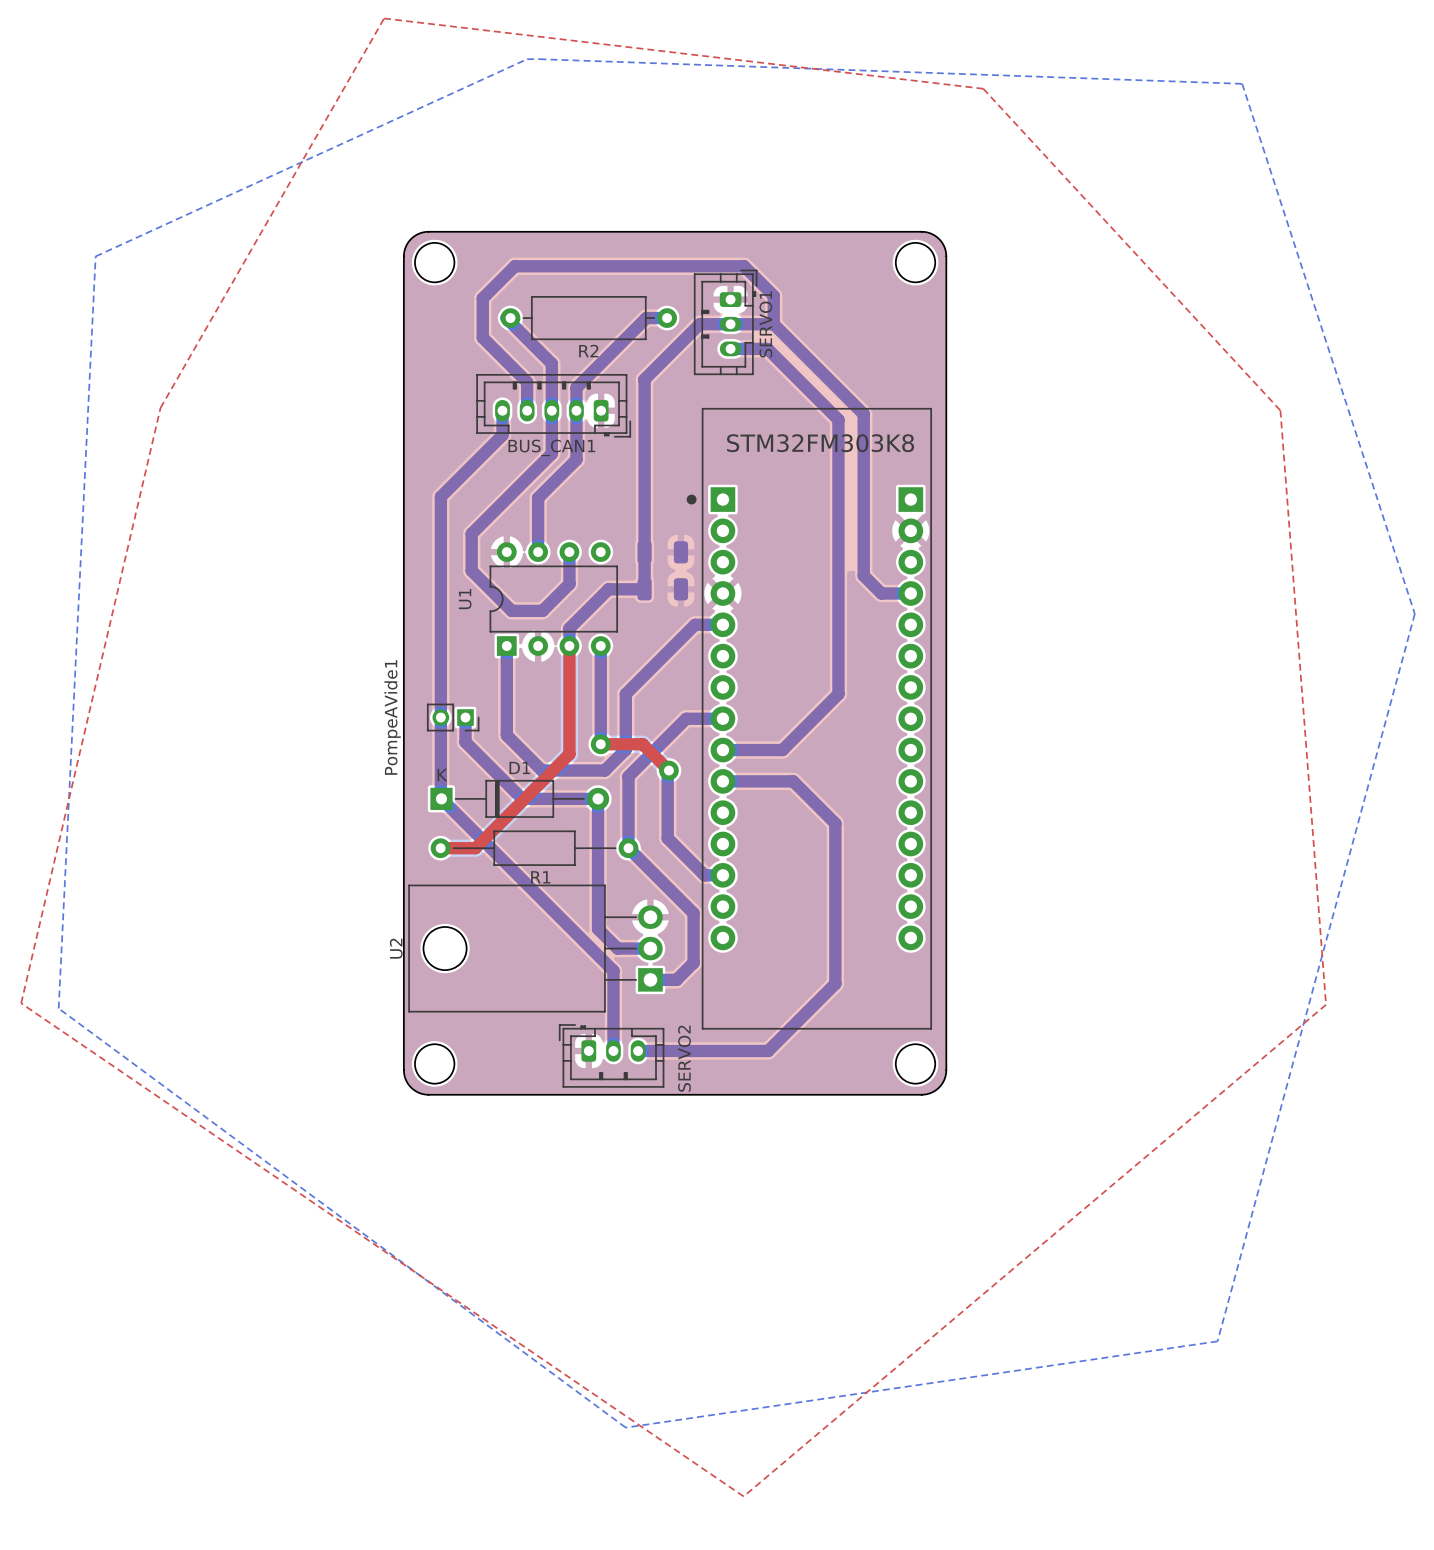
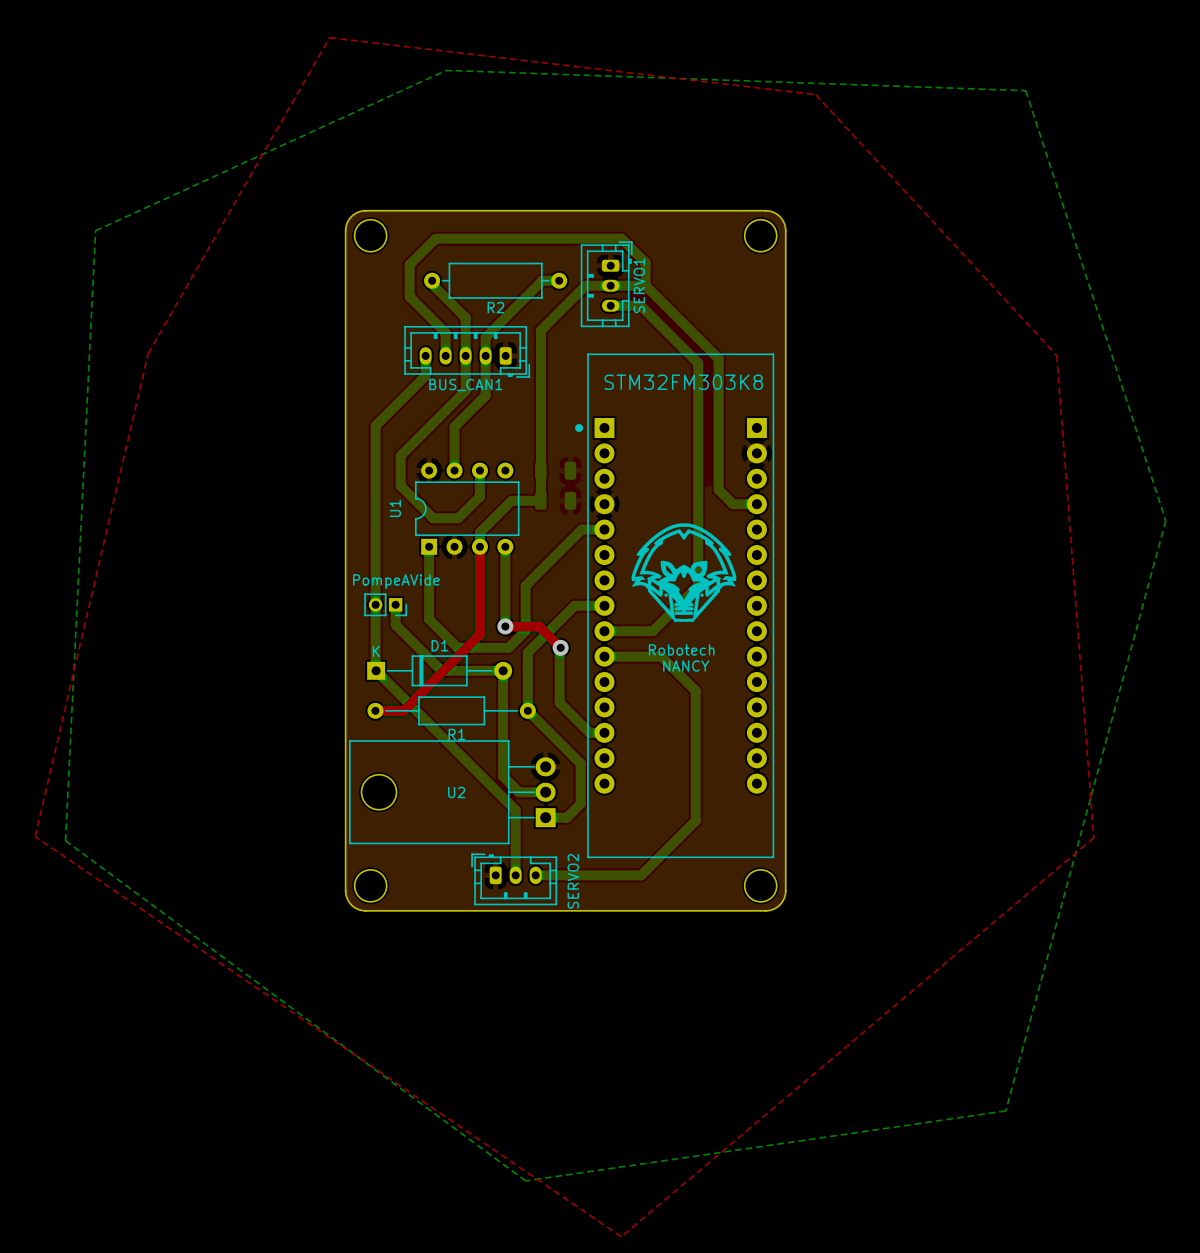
drawing: none -> [631, 523, 737, 622]
PompeAVide1 name: PompeAVide1 (392, 717) -> PompeAVide (396, 581)
text: none -> Robotech (681, 649)
text: none -> NANCY (686, 665)
U2 name rotation: 0° (396, 948) -> 90° clockwise (456, 792)
U2 name position: U2 (396, 948) -> U2 (456, 792)

